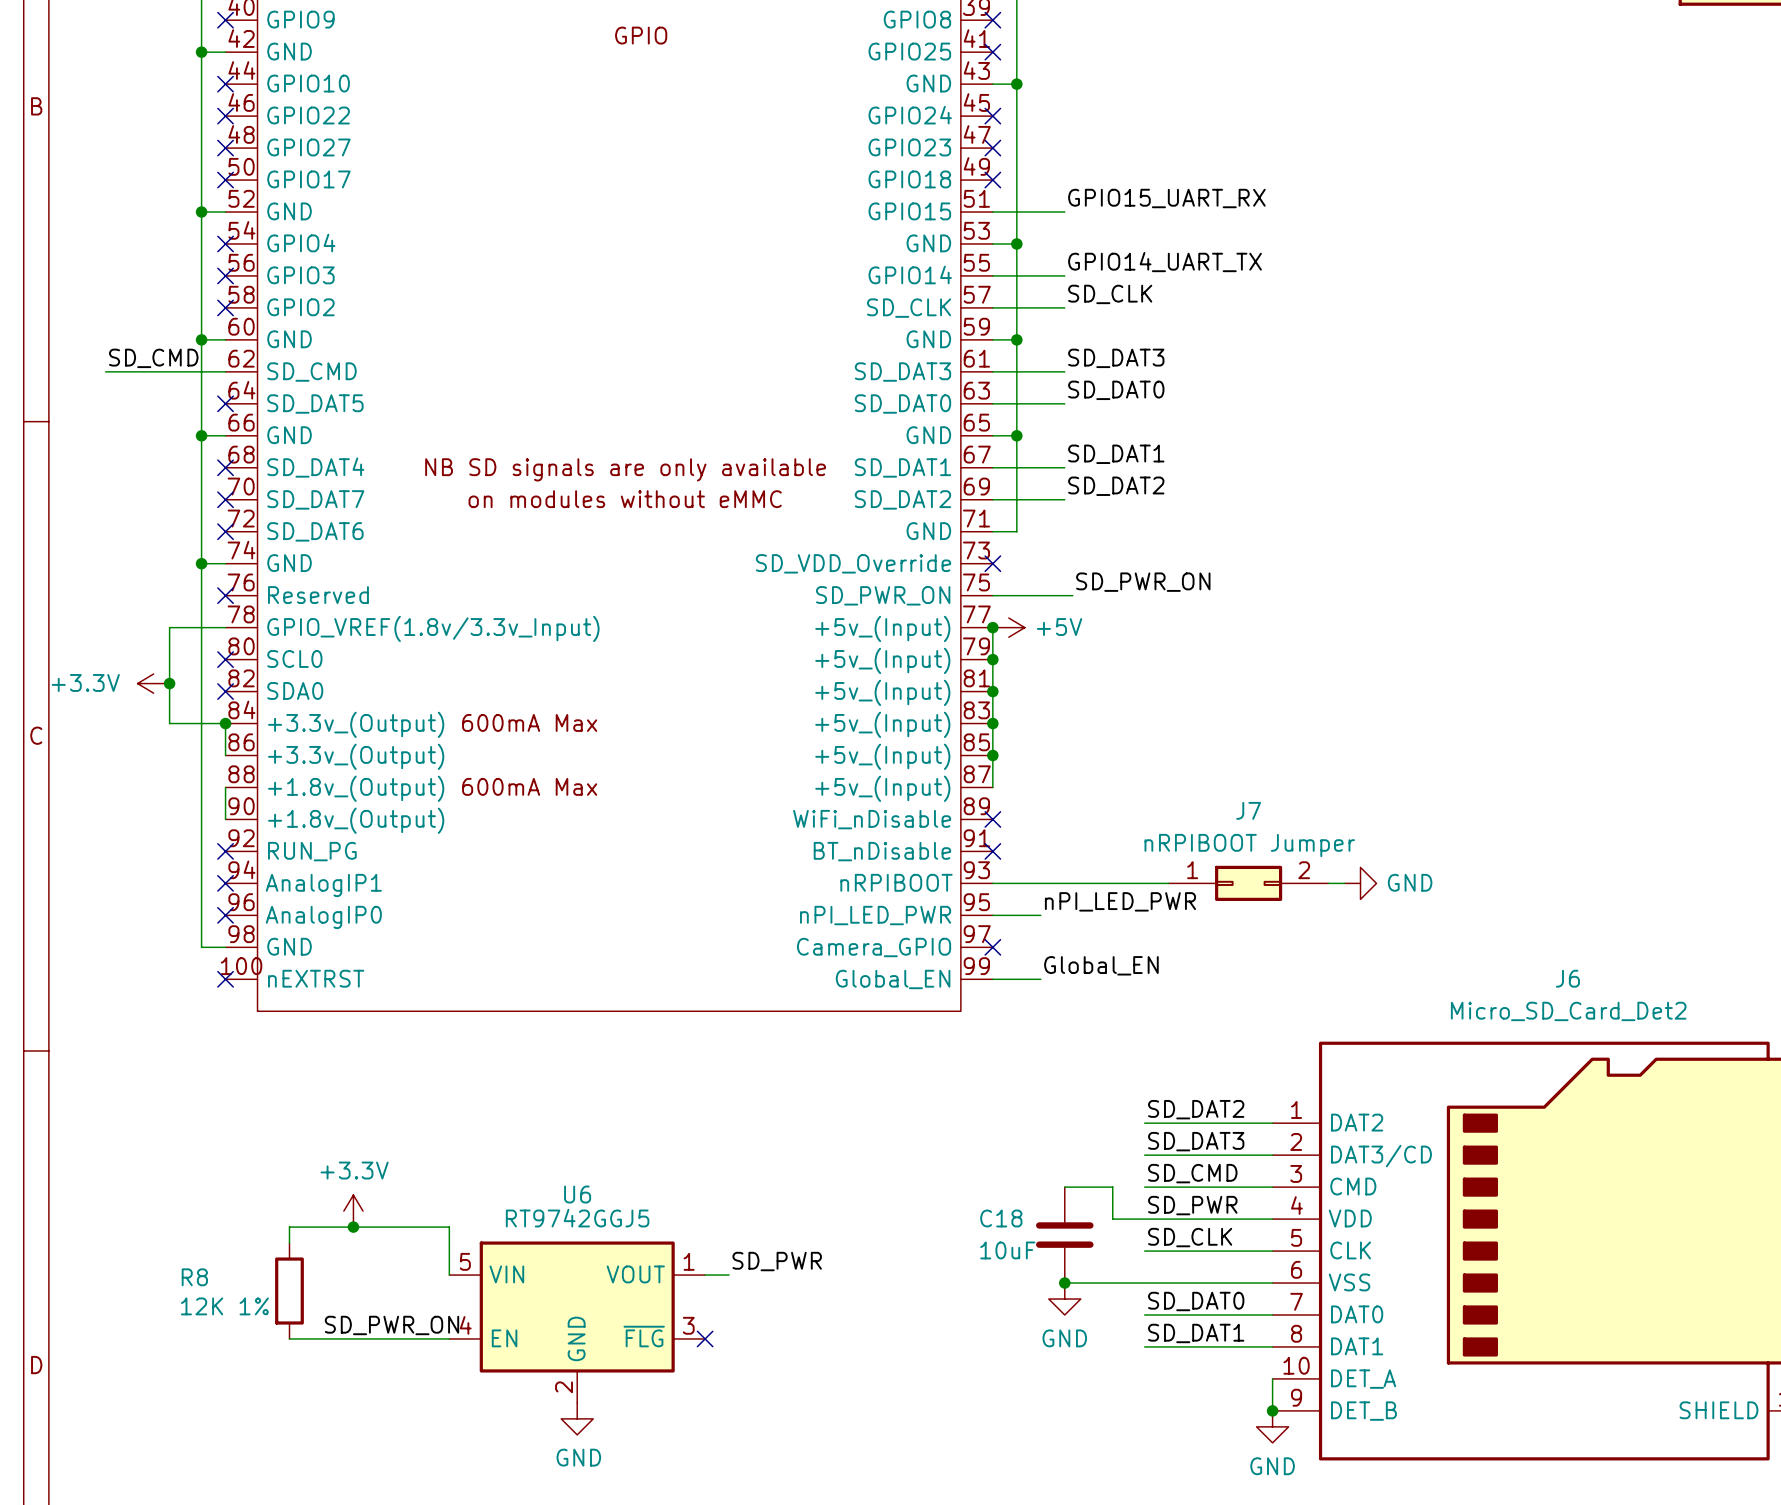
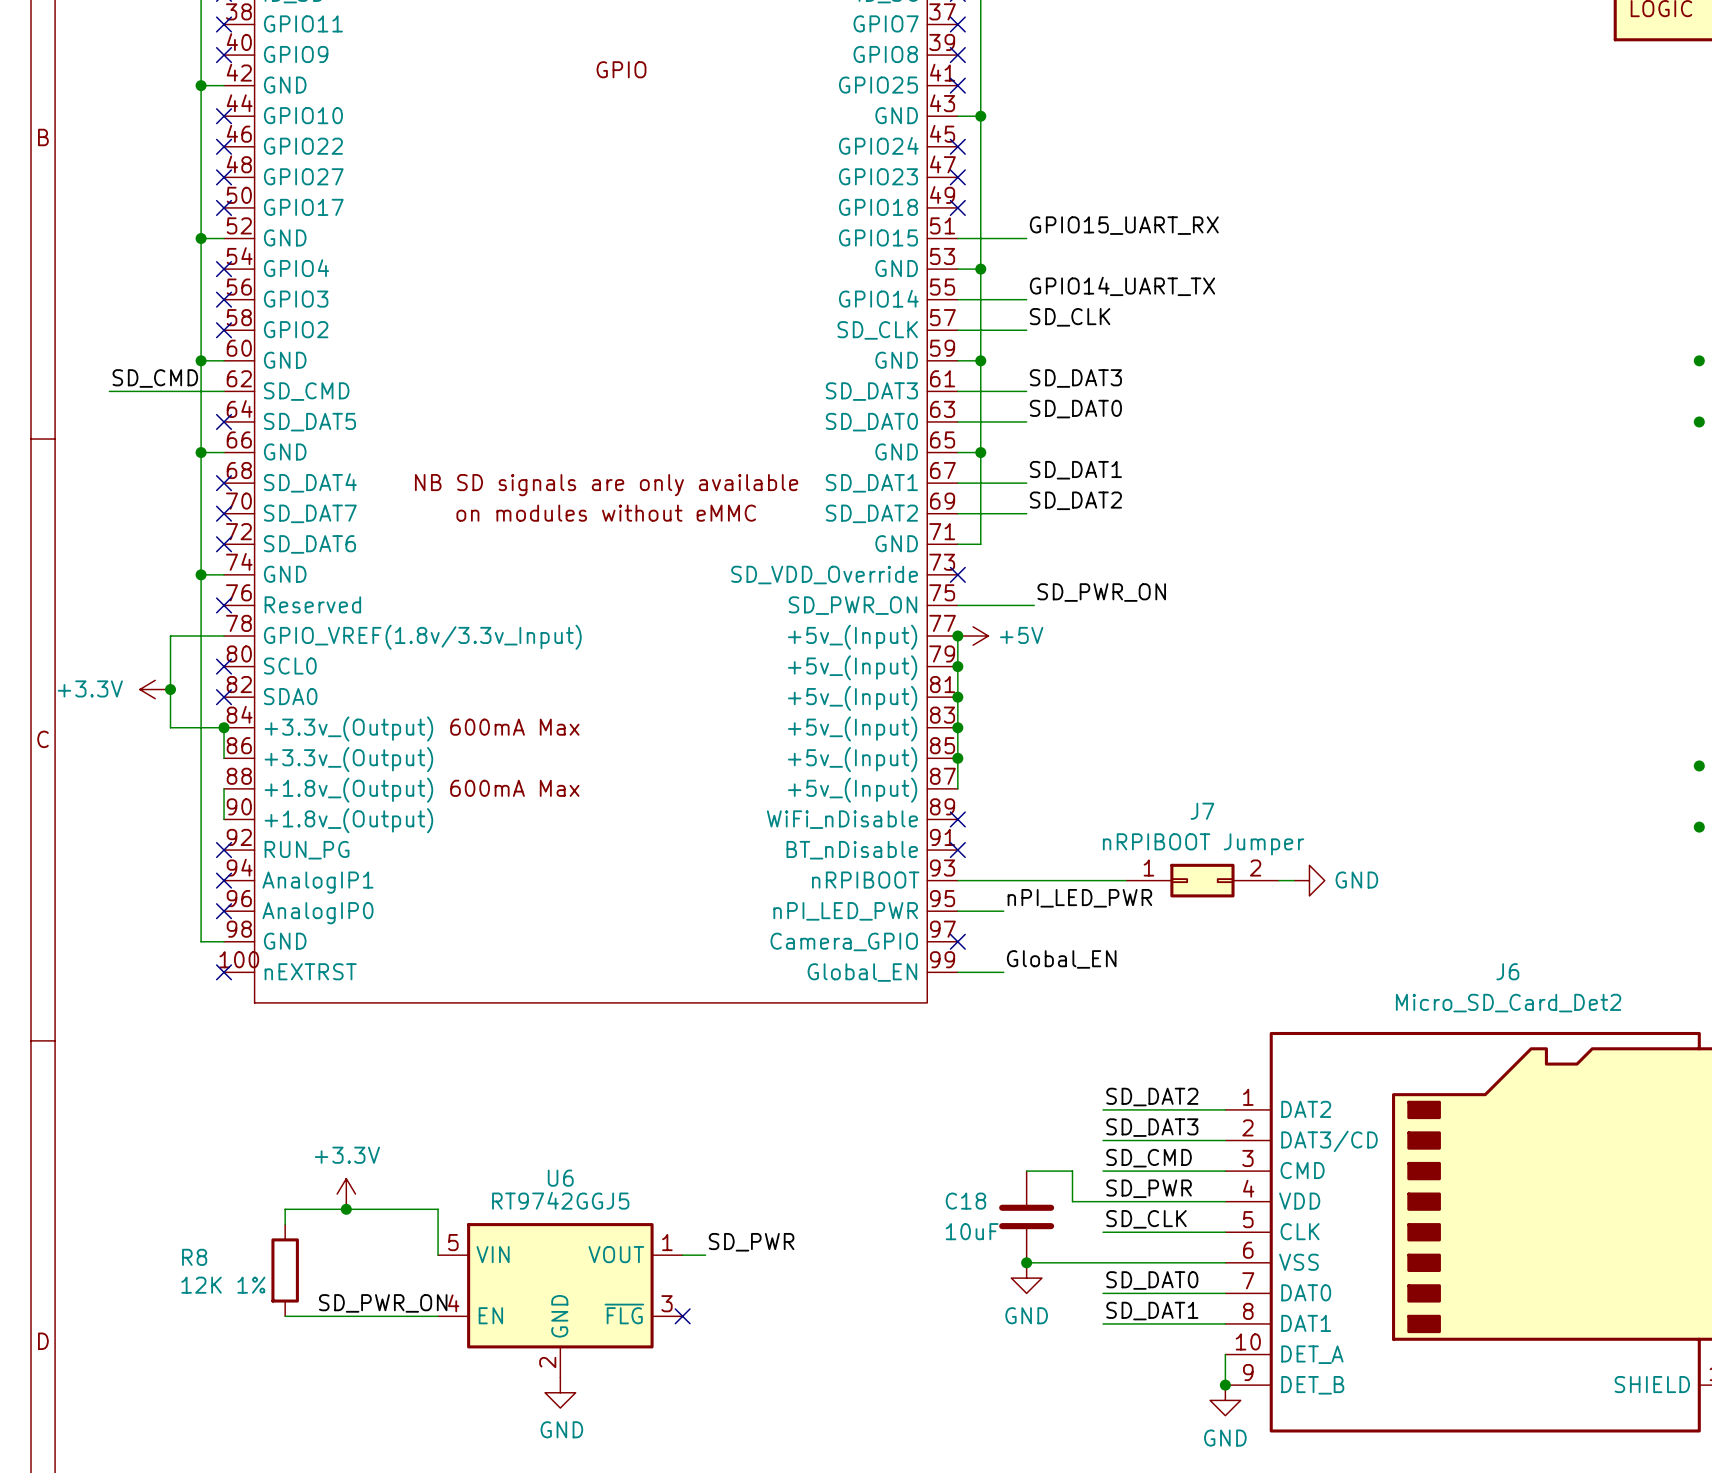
junction: none -> (1699, 360)
junction: none -> (1699, 421)
junction: none -> (1699, 765)
junction: none -> (1699, 827)

